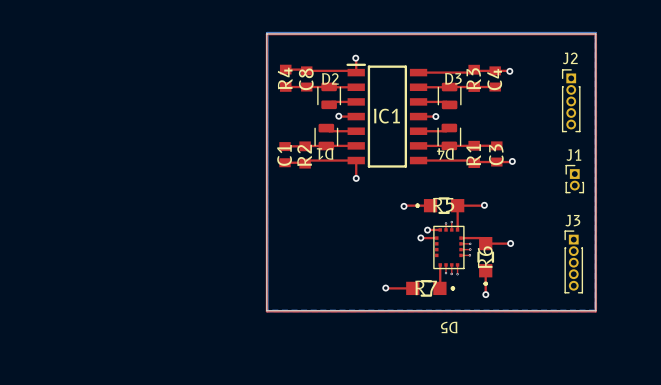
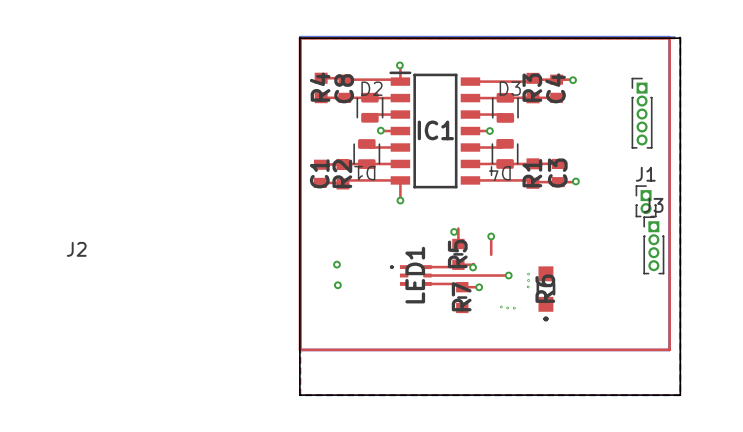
board edge: (595, 33) (595, 310) (266, 310) -> (669, 38) (680, 38) (680, 395) (299, 395) (299, 349)
J2 name position: J2 (570, 58) -> J2 (76, 249)
R5 footprint: [415, 197, 465, 215] -> [452, 238, 465, 270]
top track: none -> (458, 228) (458, 244)
top track: (430, 205) (404, 206) -> none
top track: (484, 205) (457, 205) (457, 228) -> none
via: (484, 205) -> none
top track: none -> (491, 236) (491, 254)
via: none -> (491, 236)
top track: (451, 222) (451, 229) -> none
via: (451, 222) -> none
top track: (446, 223) (446, 229) -> none
via: (446, 223) -> none
top track: (440, 229) (427, 230) -> none
via: (427, 230) -> none
J3 footprint: [564, 230, 584, 294] -> [643, 216, 665, 275]
top track: none -> (473, 263) (458, 264) (456, 267) (427, 267)
via: none -> (336, 264)
top track: (420, 238) (436, 238) -> none
top track: (461, 238) (480, 238) (485, 243) (510, 243) -> none
top track: (461, 243) (470, 243) -> none
via: (510, 243) -> none
LED1: none -> (410, 275)
top track: none -> (427, 275) (508, 275)
via: none -> (508, 275)
D5: (448, 247) -> none
top track: (461, 249) (470, 249) -> none
top track: none -> (427, 283) (459, 283) (462, 287) (479, 287)
via: none -> (337, 285)
via: none -> (479, 287)
top track: (461, 255) (469, 255) -> none
top track: (440, 264) (439, 288) -> none
top track: (446, 264) (446, 273) -> none
top track: (451, 264) (451, 273) -> none
top track: (457, 264) (457, 274) -> none
top track: (485, 270) (485, 294) -> none
R7 footprint: [406, 280, 456, 297] -> [456, 282, 469, 314]
top track: (385, 288) (412, 288) -> none
via: (385, 288) -> none
via: (485, 294) -> none

